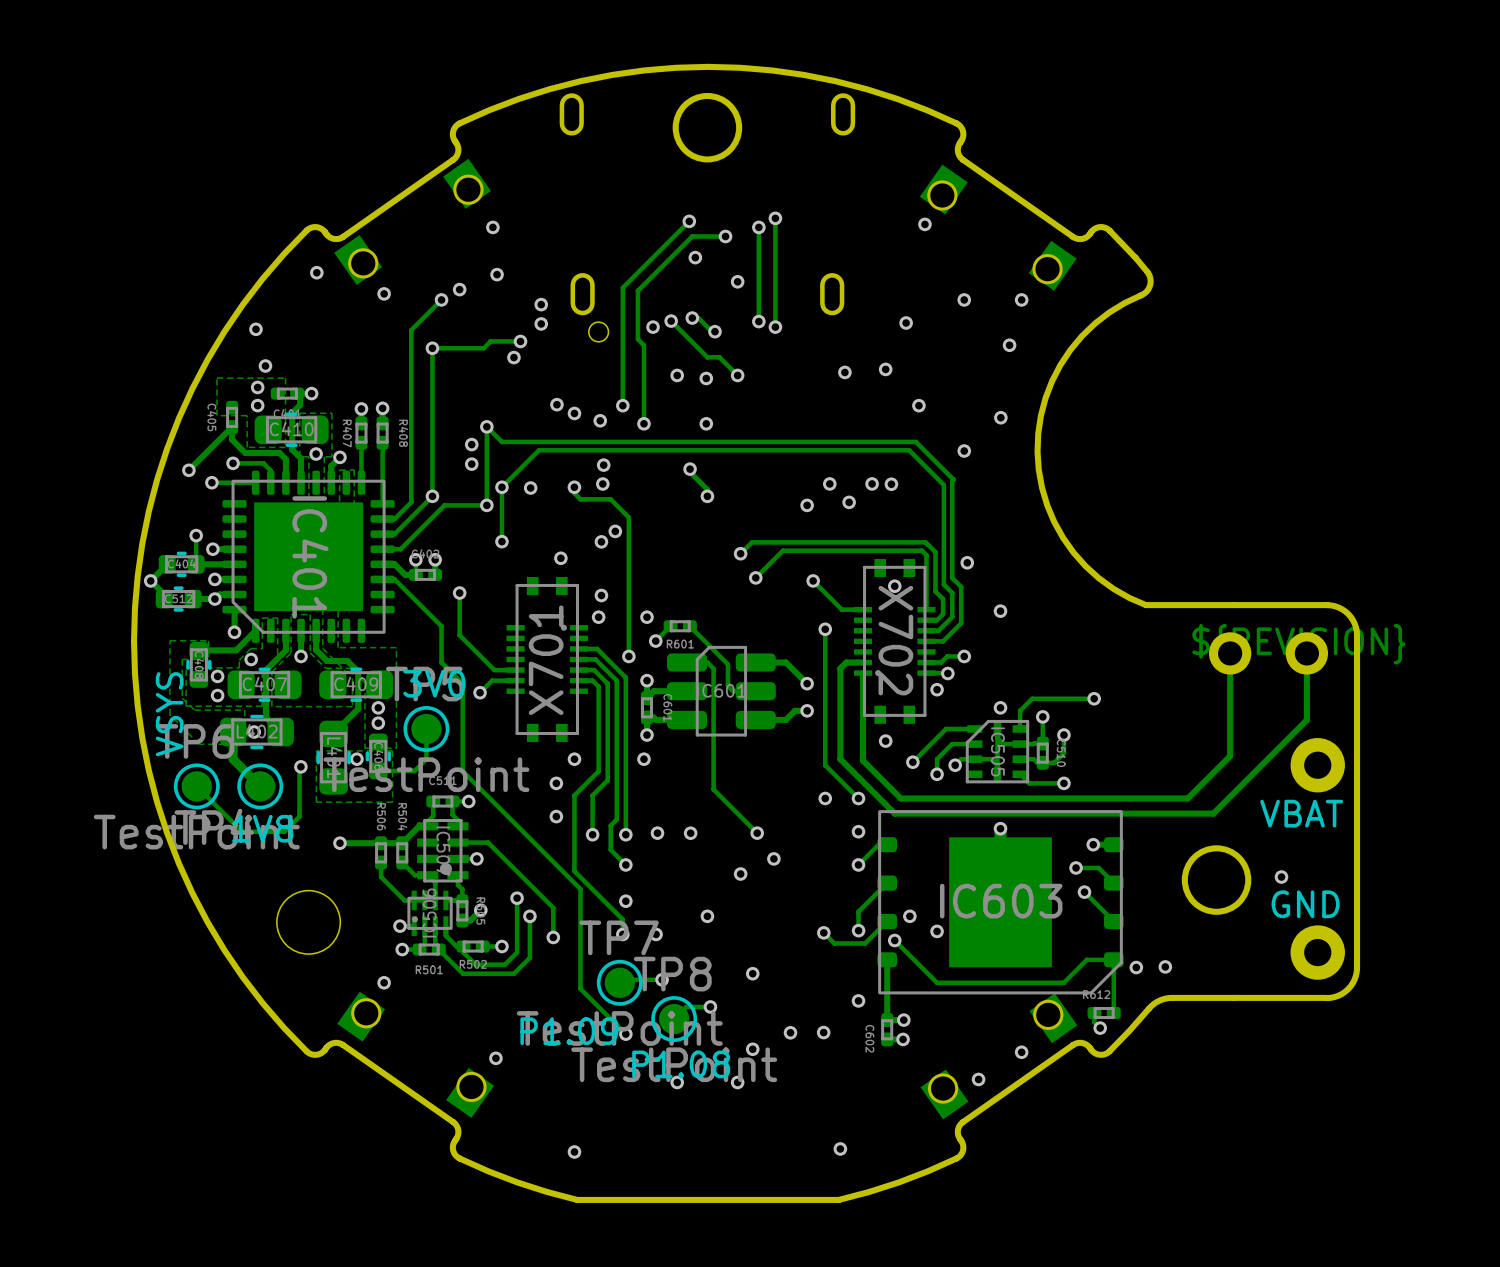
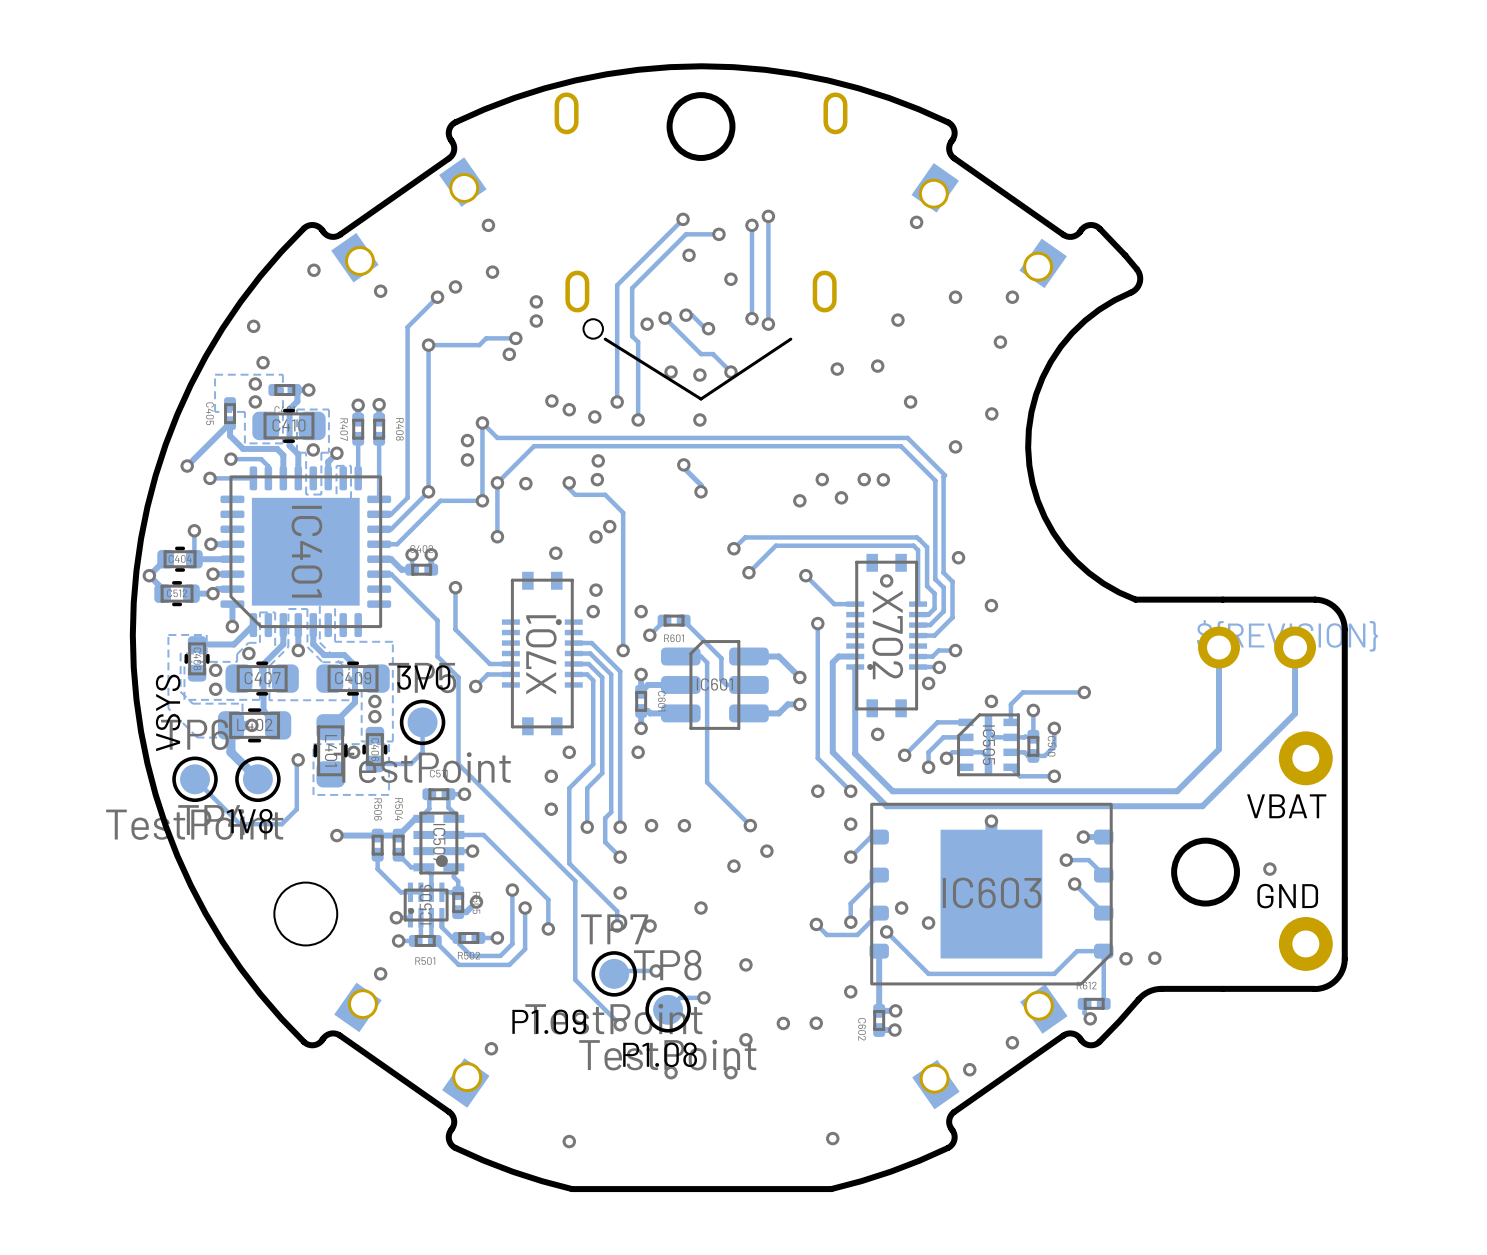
line: none -> (790, 339) (701, 399) (605, 339)

